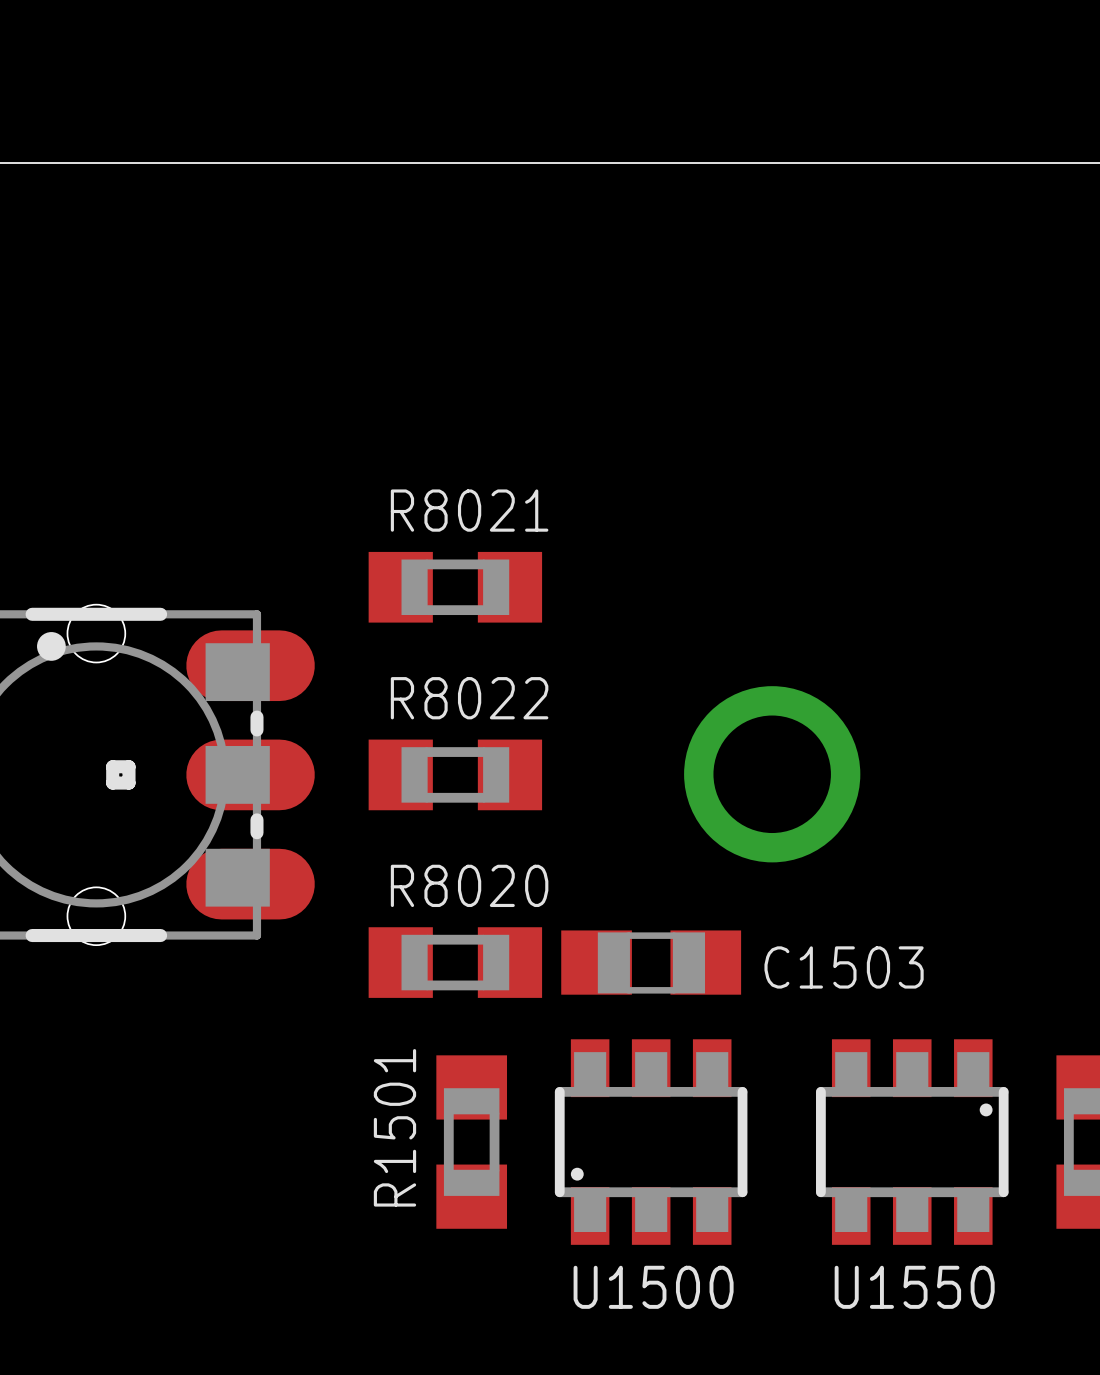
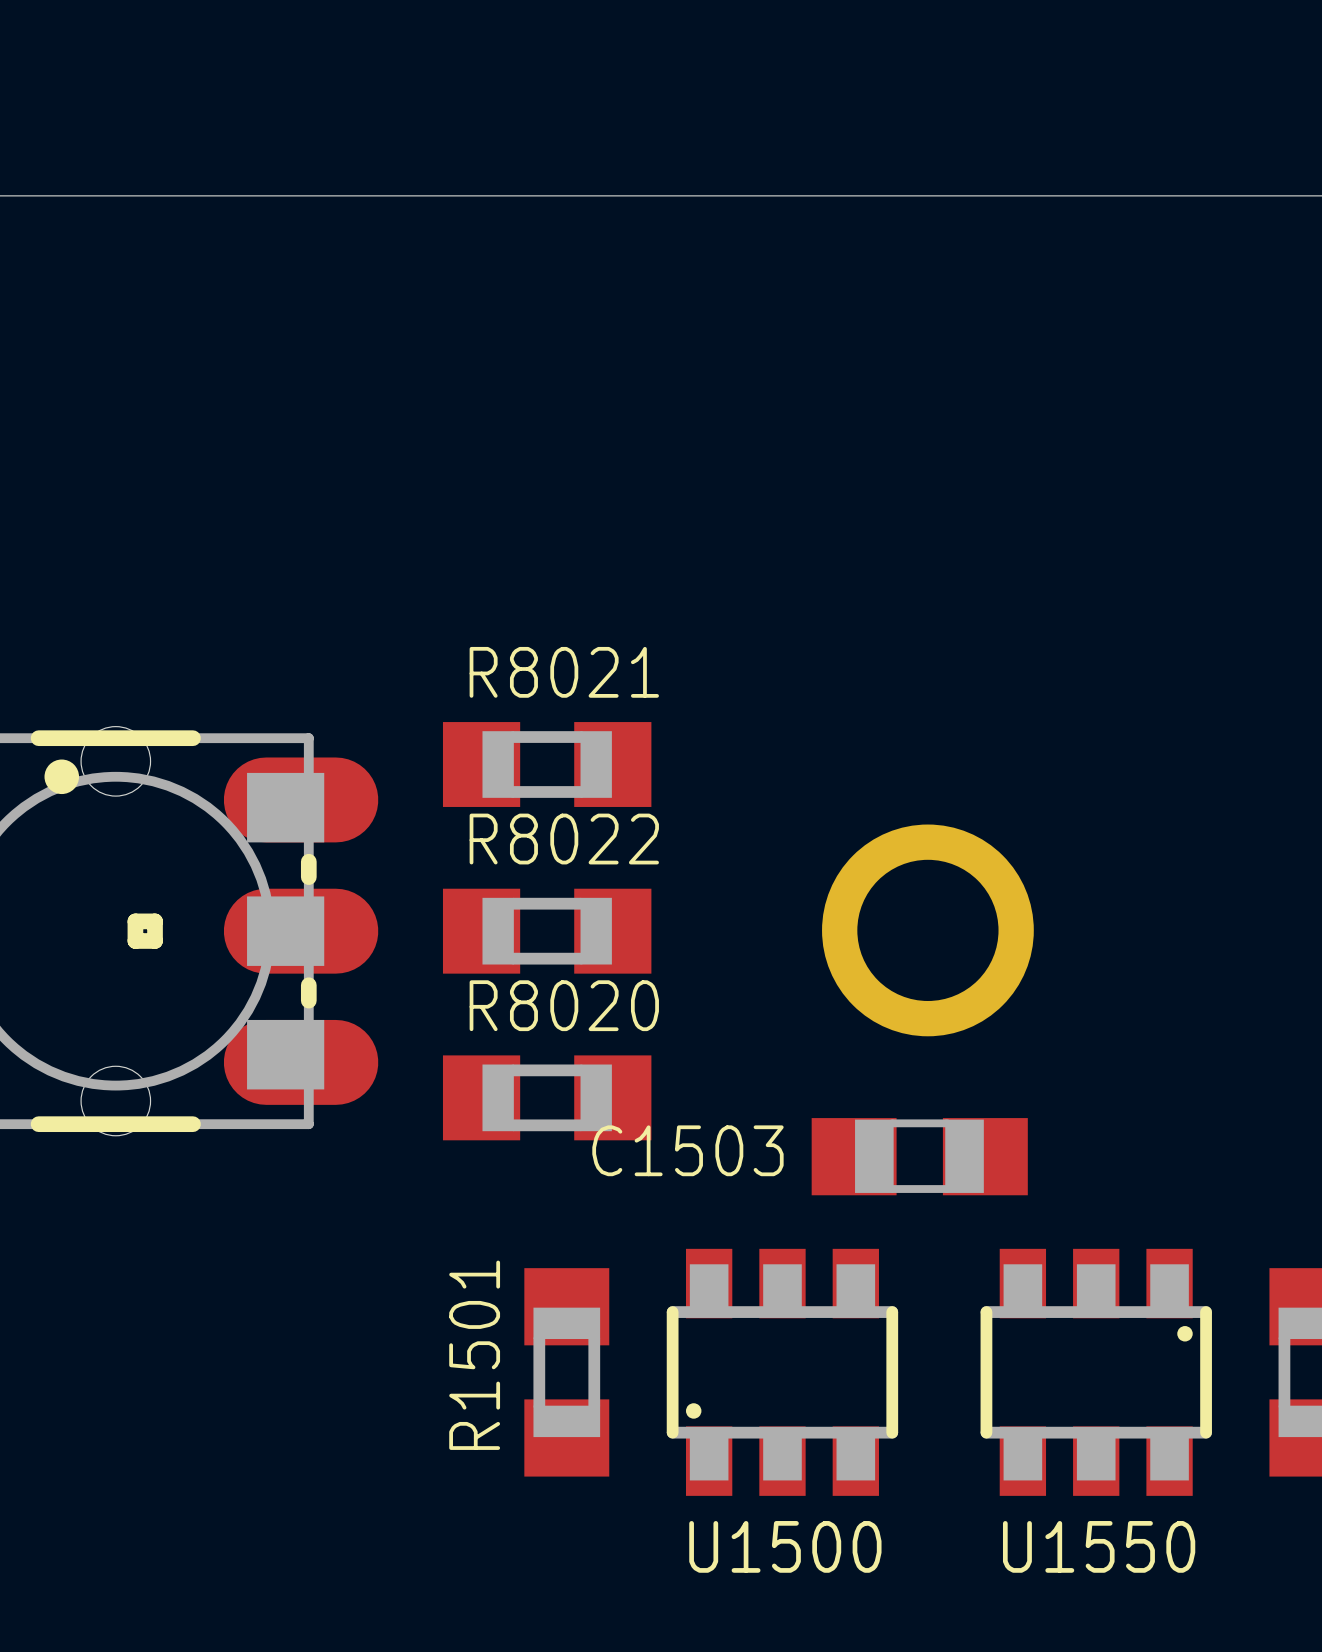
R8021 position: (455, 587) -> (547, 764)
R8020 position: (455, 962) -> (547, 1097)
C1503 position: (651, 962) -> (919, 1156)
C1503 name position: C1503 (844, 967) -> C1503 (687, 1150)

